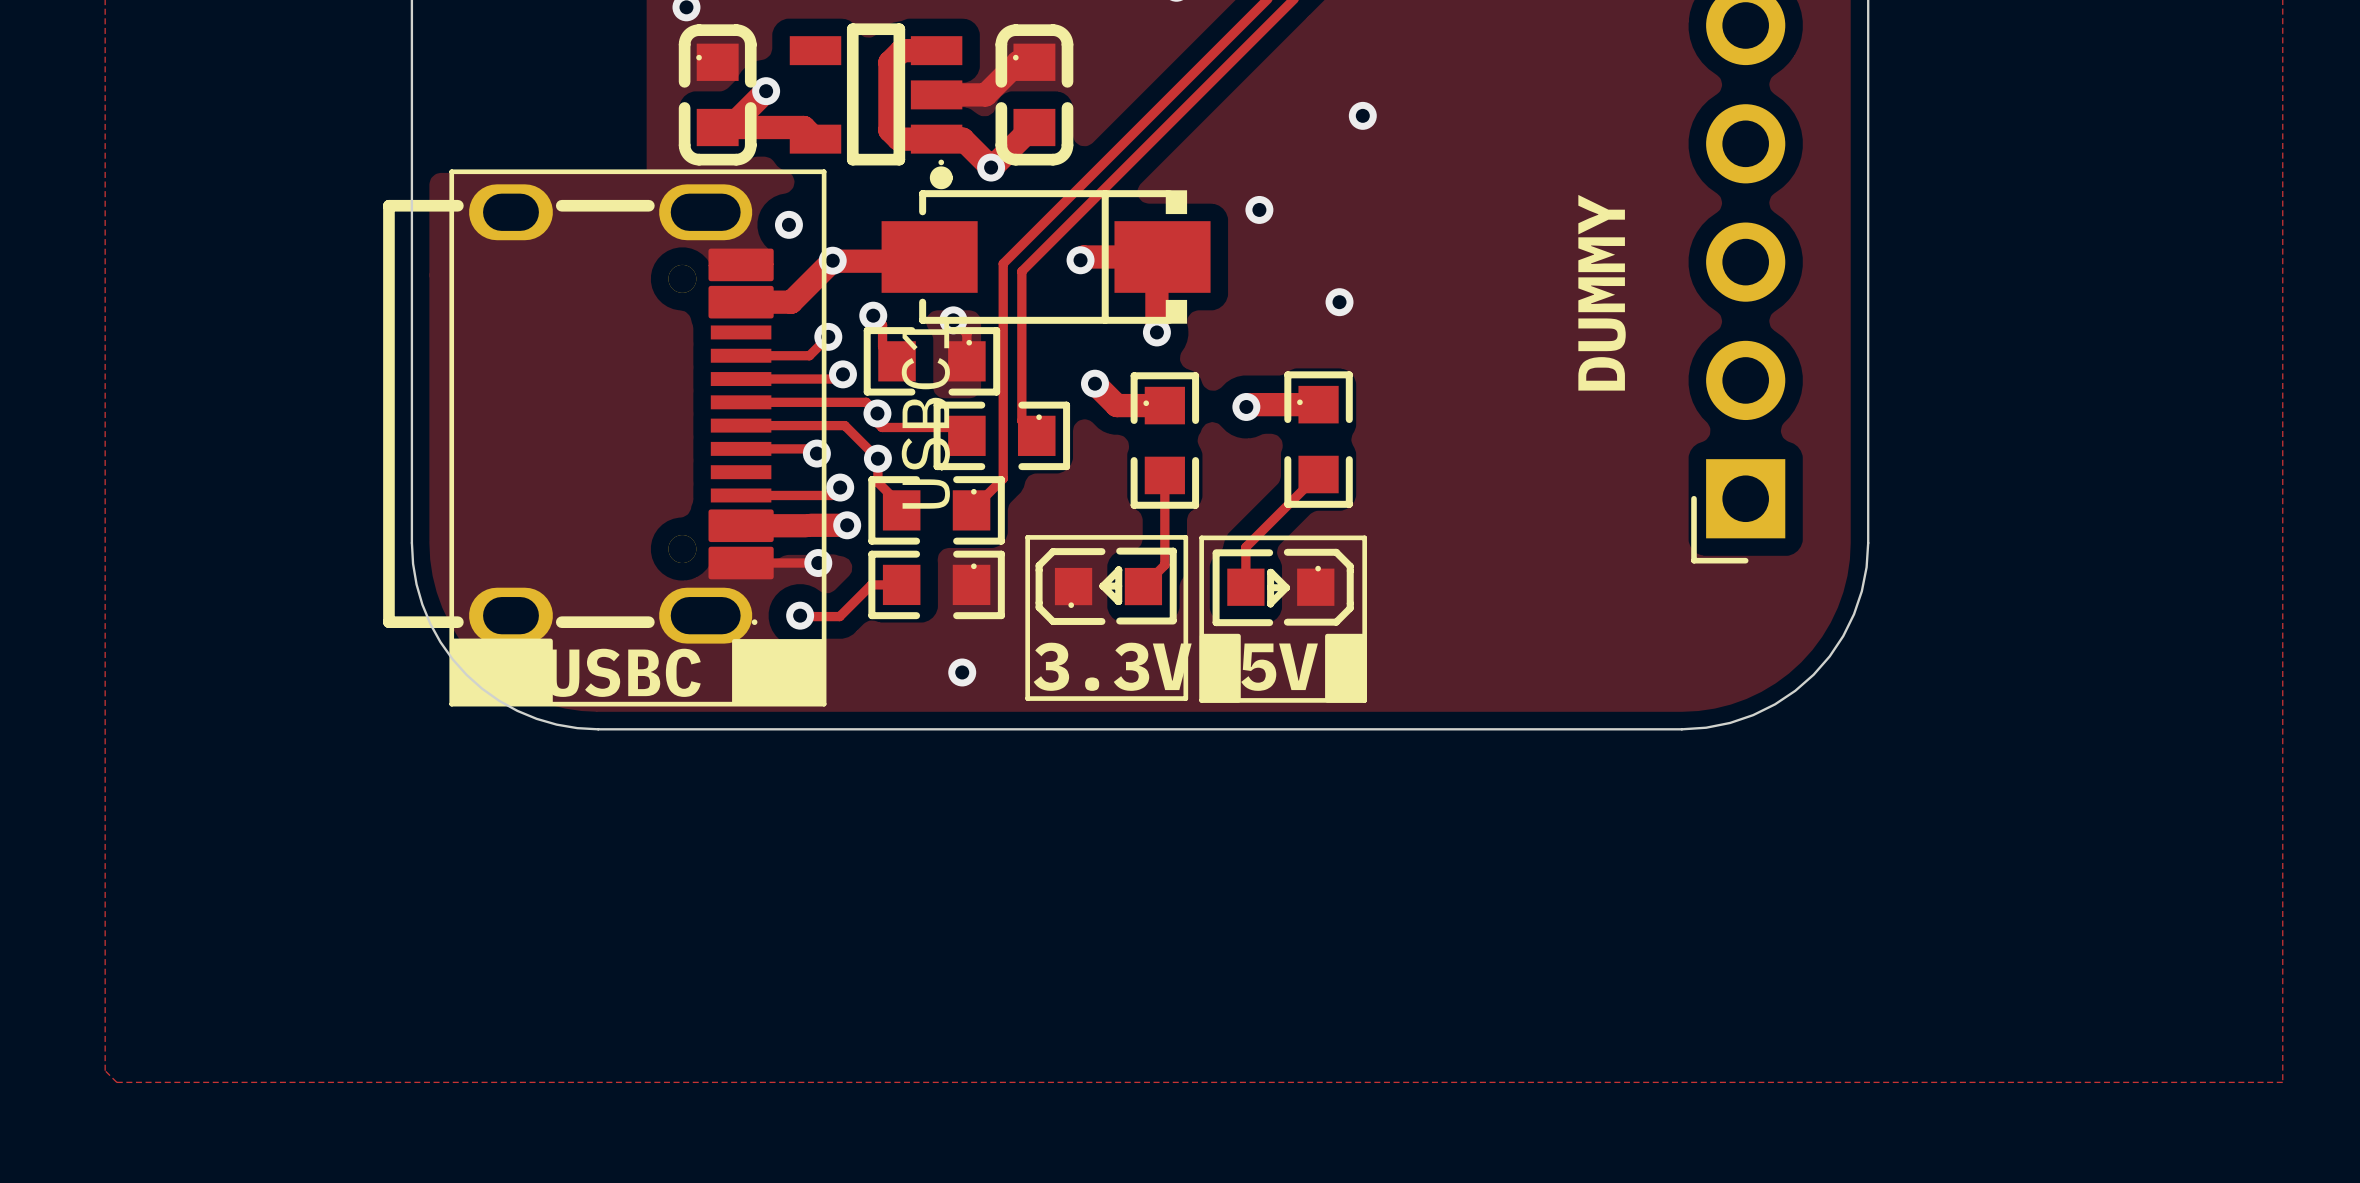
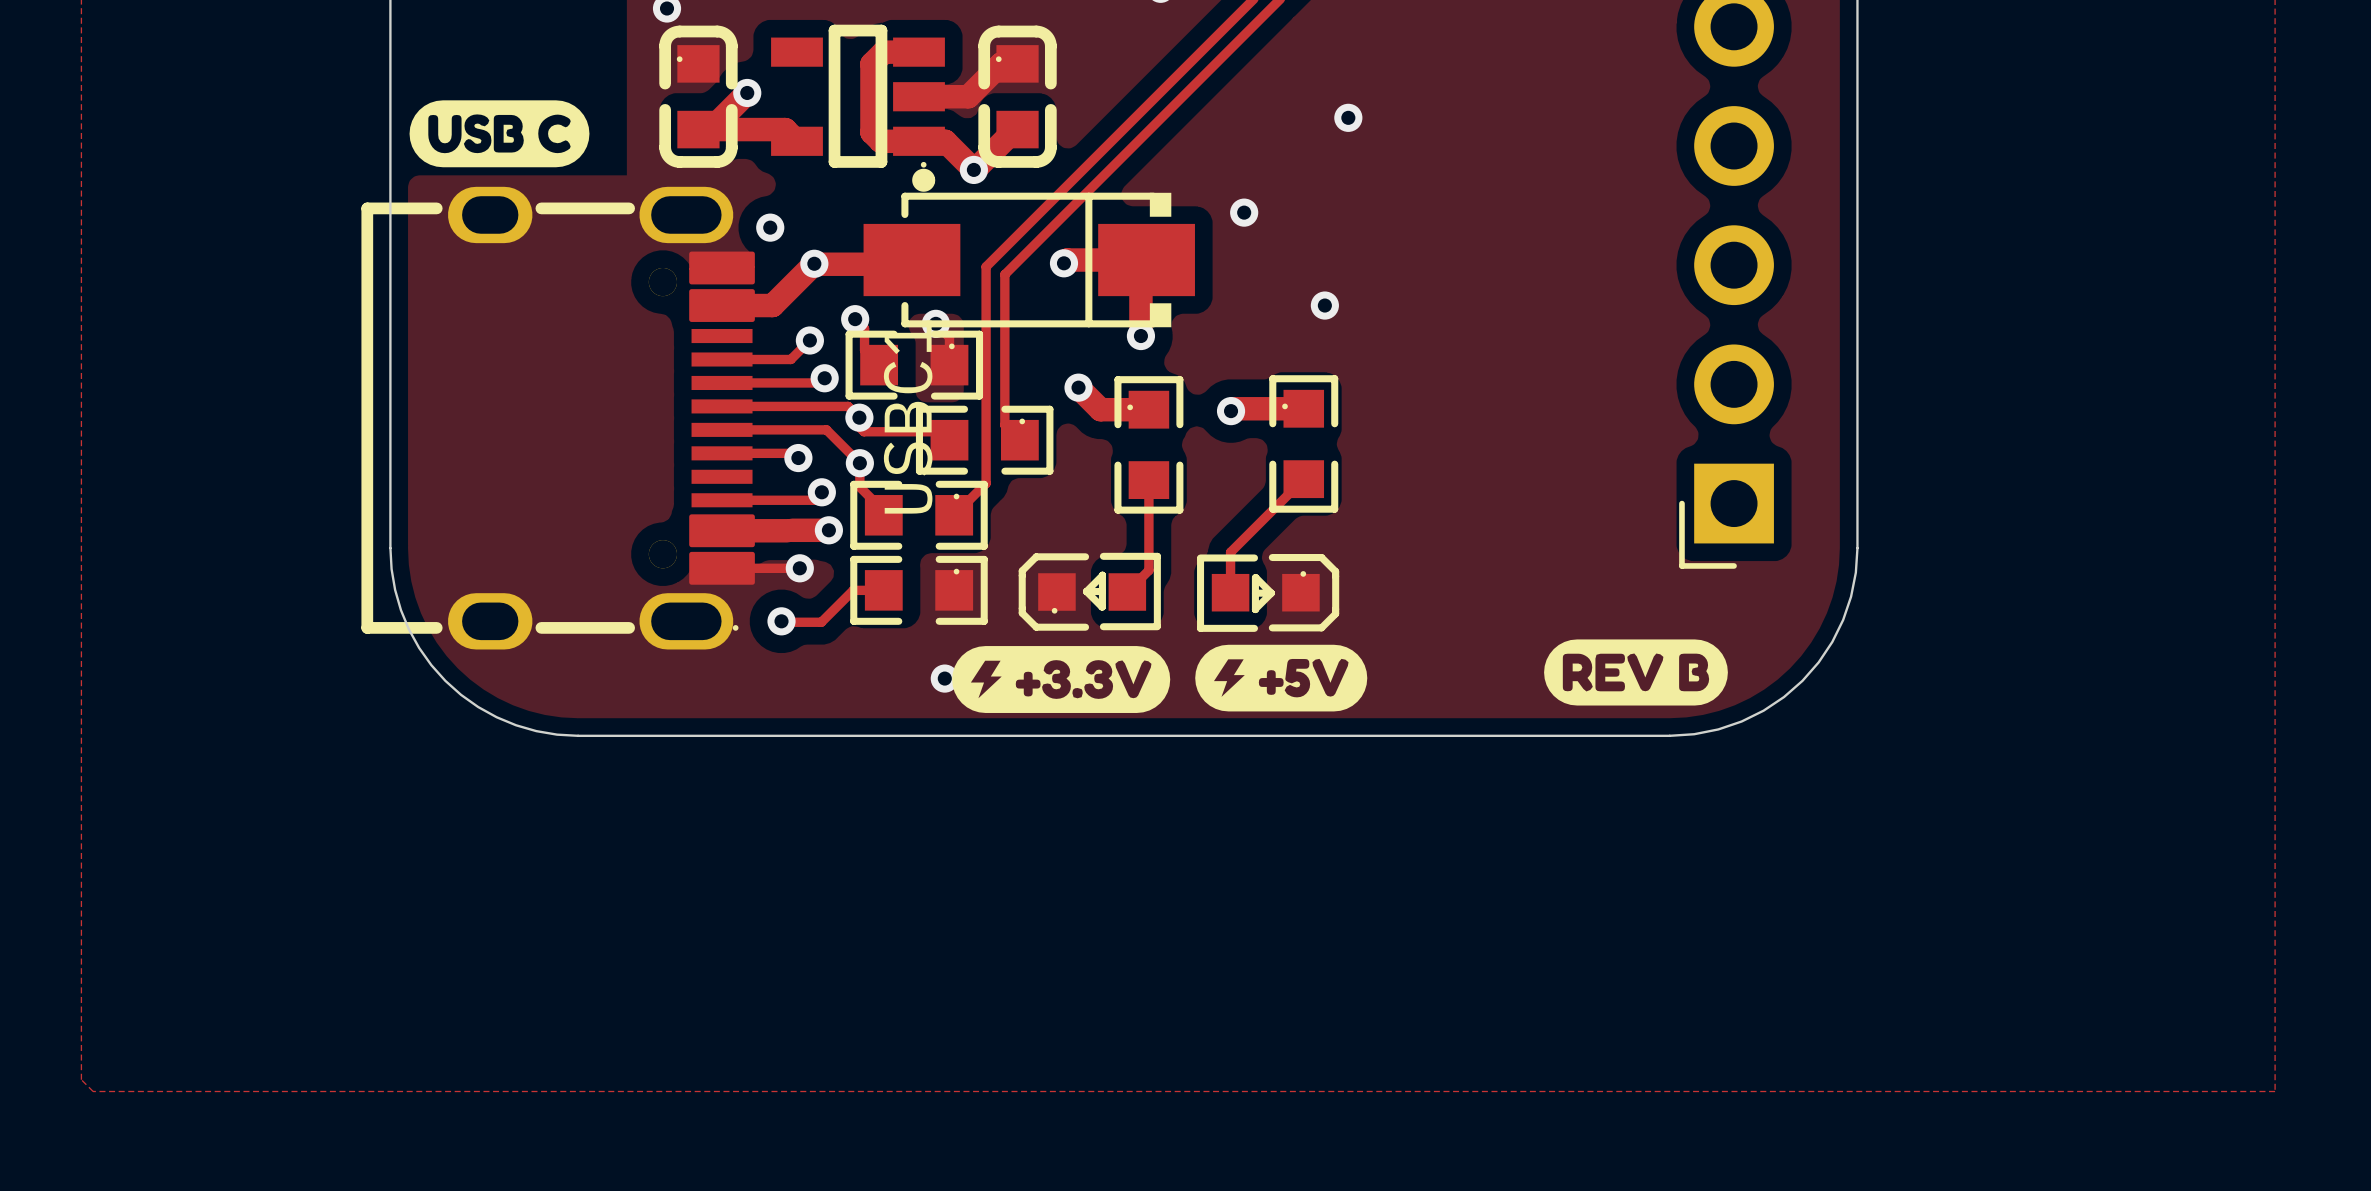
drawing: none -> [409, 100, 590, 168]
line: (451, 171) (824, 171) (824, 704) (451, 704) (451, 171) -> none
text: DUMMY (1602, 292) -> none
line: (1027, 537) (1185, 537) (1185, 698) (1027, 698) (1027, 537) -> none
line: (1201, 537) (1364, 537) (1364, 700) (1201, 700) (1201, 537) -> none
drawing: [1199, 633, 1241, 703] -> none
drawing: [1325, 633, 1368, 703] -> none
drawing: none -> [1544, 639, 1728, 706]
drawing: [451, 638, 553, 706] -> none
drawing: none -> [952, 644, 1368, 713]
drawing: [732, 639, 826, 706] -> none
text: 3.3V (1112, 666) -> none
text: 5V (1279, 667) -> none
text: USBC (623, 672) -> none

